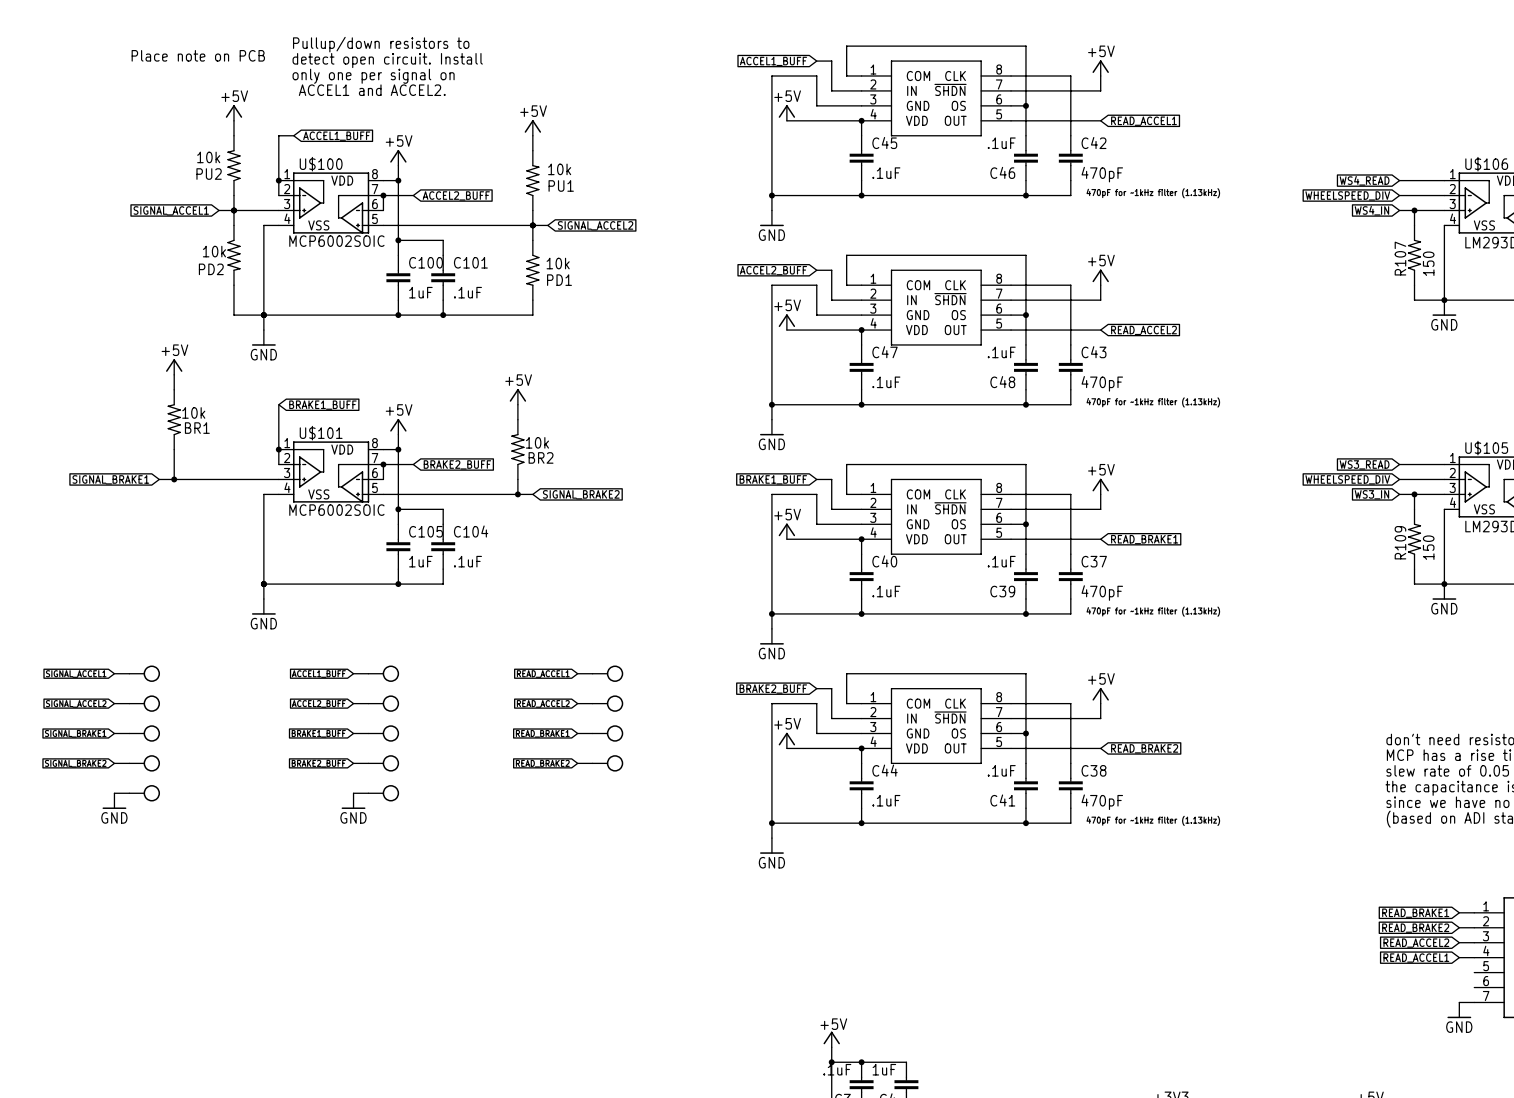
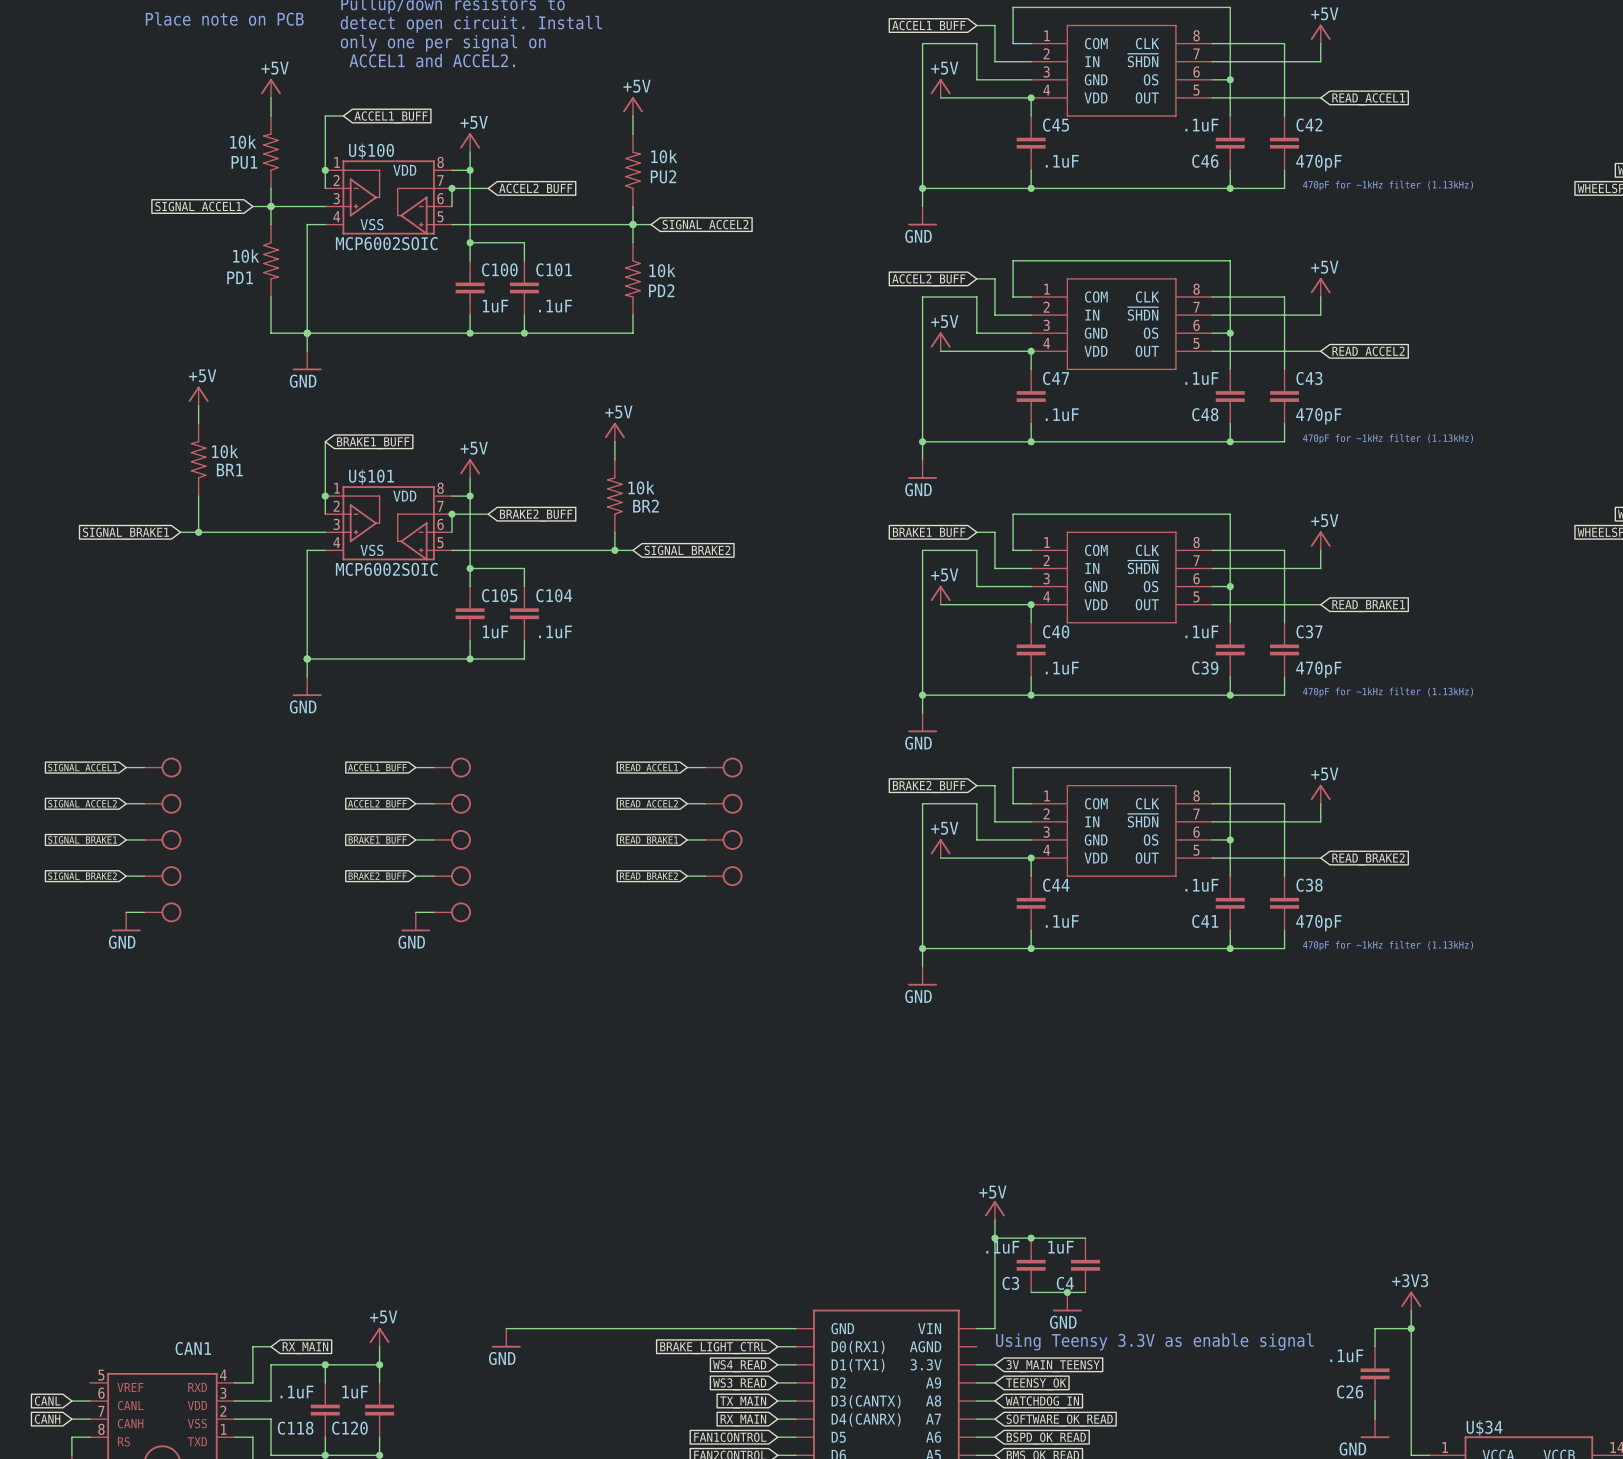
PU2 name: PU2 (209, 174) -> PU1 (244, 162)
PU1 name: PU1 (561, 185) -> PU2 (663, 176)
PD2 name: PD2 (211, 269) -> PD1 (240, 277)
PD1 name: PD1 (559, 280) -> PD2 (661, 290)

